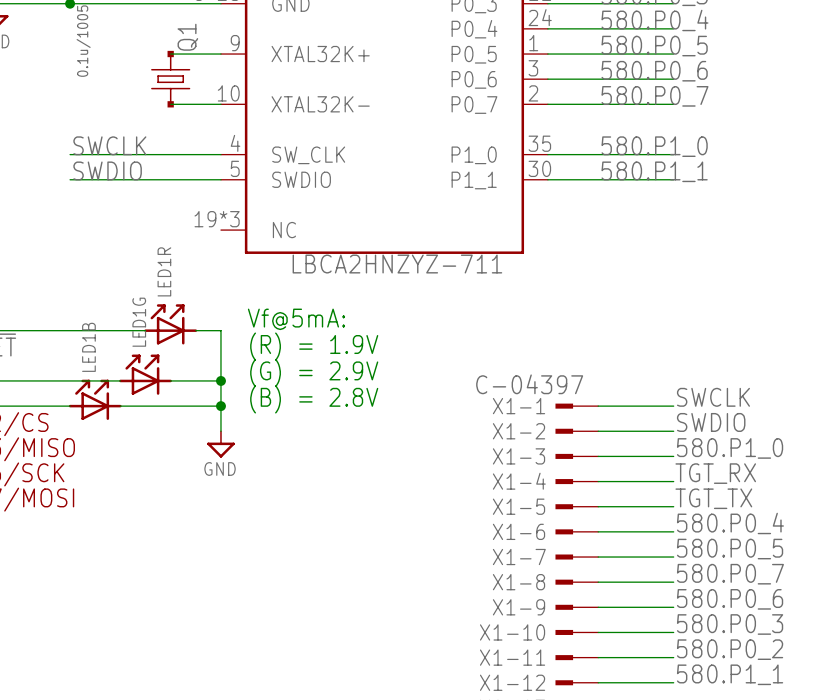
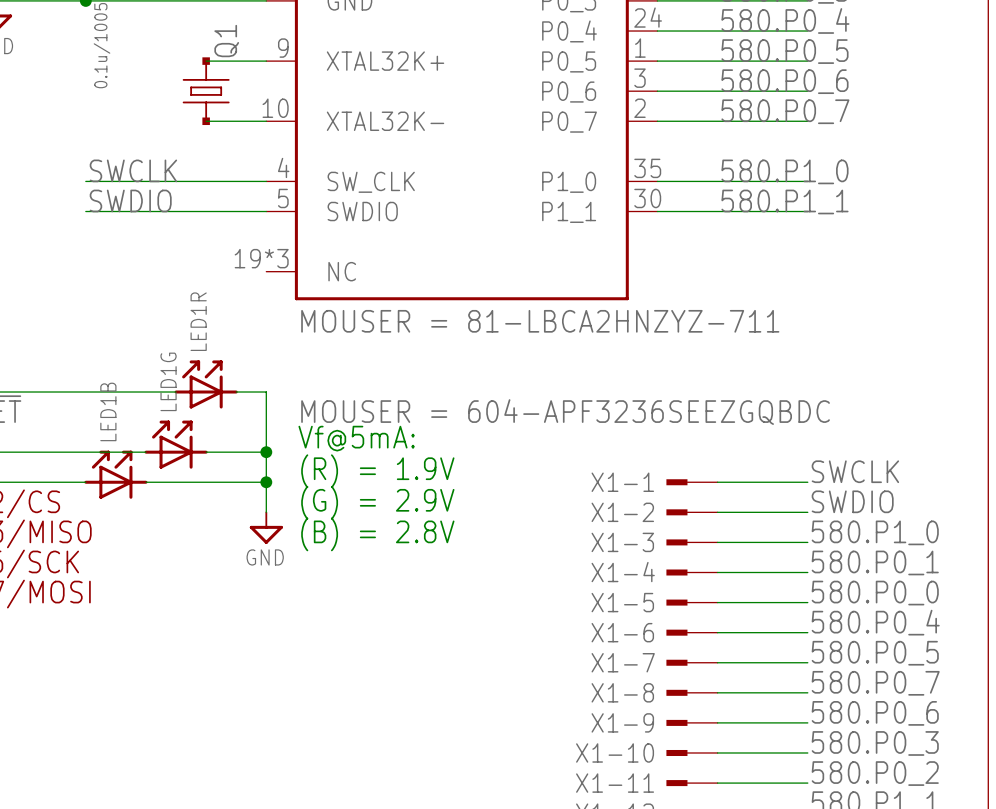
part value: LBCA2HNZYZ-711 (397, 264) -> none
part text: none -> MOUSER = 81-LBCA2HNZYZ-711 (540, 321)
text position: Vf@5mA: (296, 319) -> Vf@5mA: (356, 438)
text position: (R) = 1.9V (314, 346) -> (R) = 1.9V (377, 471)
LED1G text: none -> MOUSER = 604-APF3236SEEZGQBDC (565, 412)
text position: (G) = 2.9V (314, 373) -> (G) = 2.9V (377, 502)
X1-1 value: C-04397 (529, 384) -> none
text position: (B) = 2.8V (314, 399) -> (B) = 2.8V (377, 534)
label: TGT_RX (715, 473) -> 580.P0_1 (875, 562)
label: TGT_TX (713, 498) -> 580.P0_0 (875, 593)

